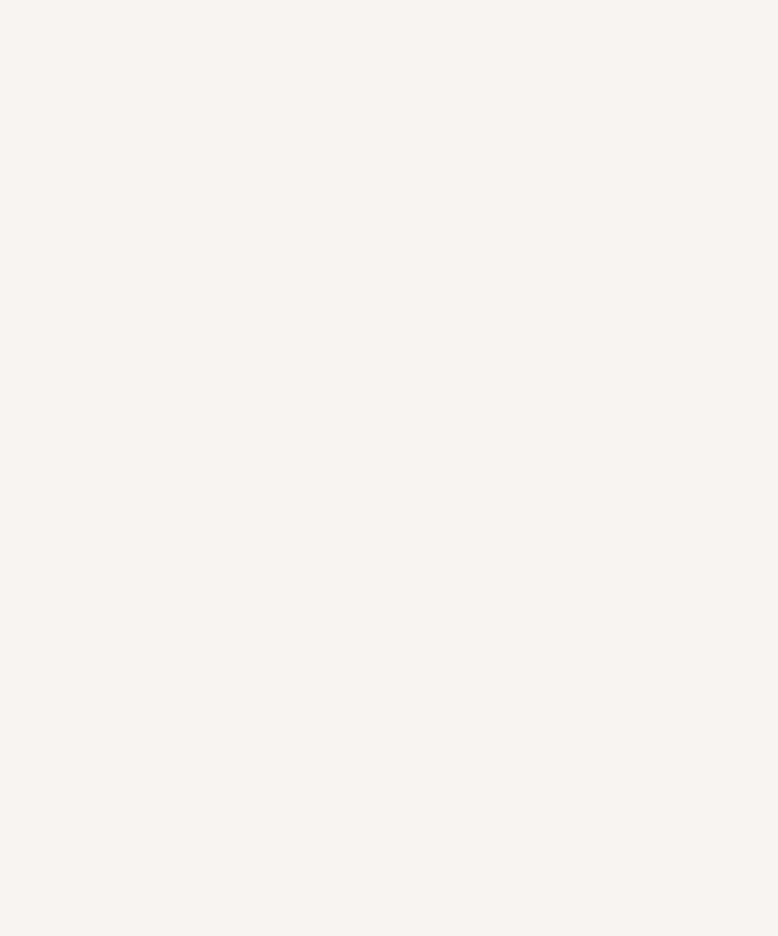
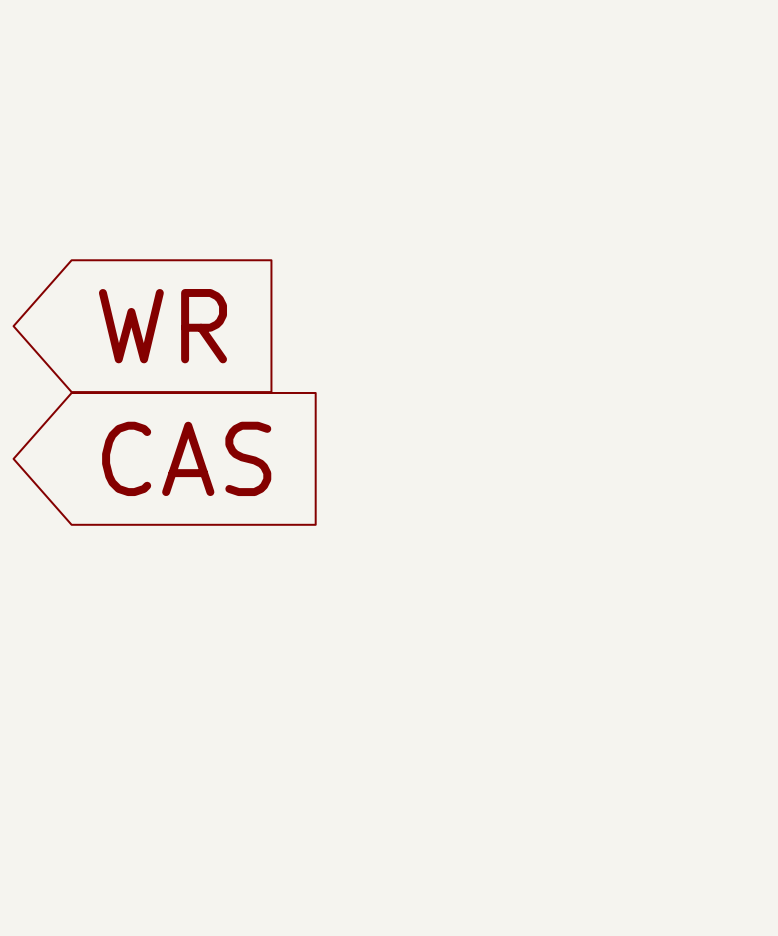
global label: none -> WR (162, 326)
global label: none -> CAS (186, 458)

